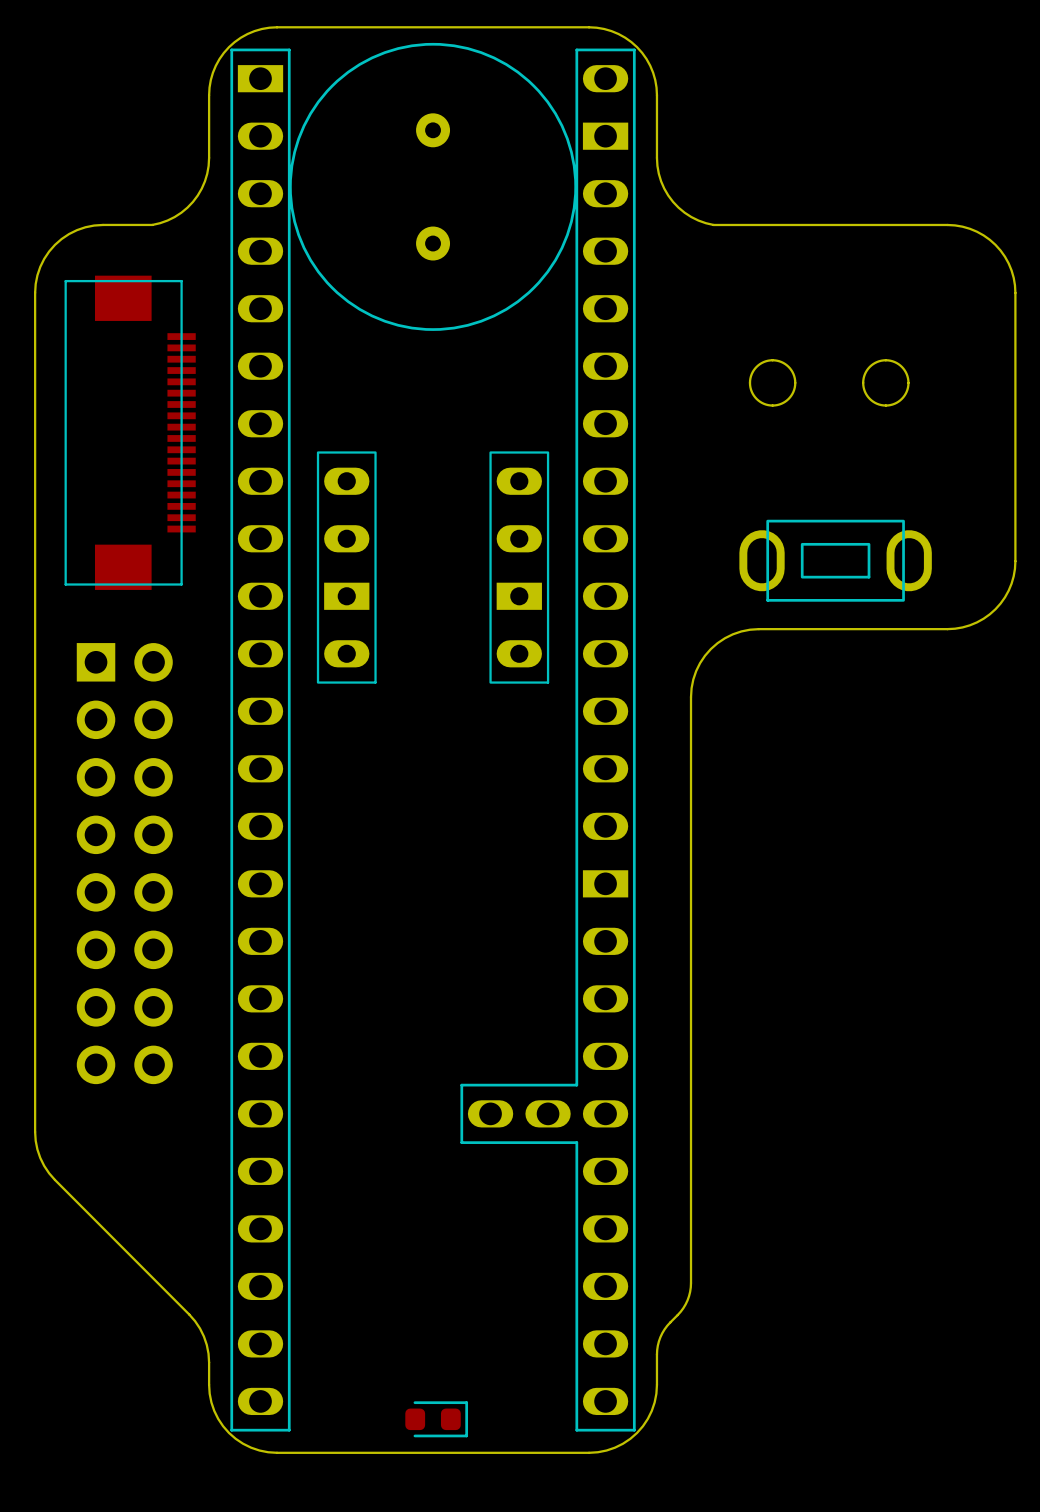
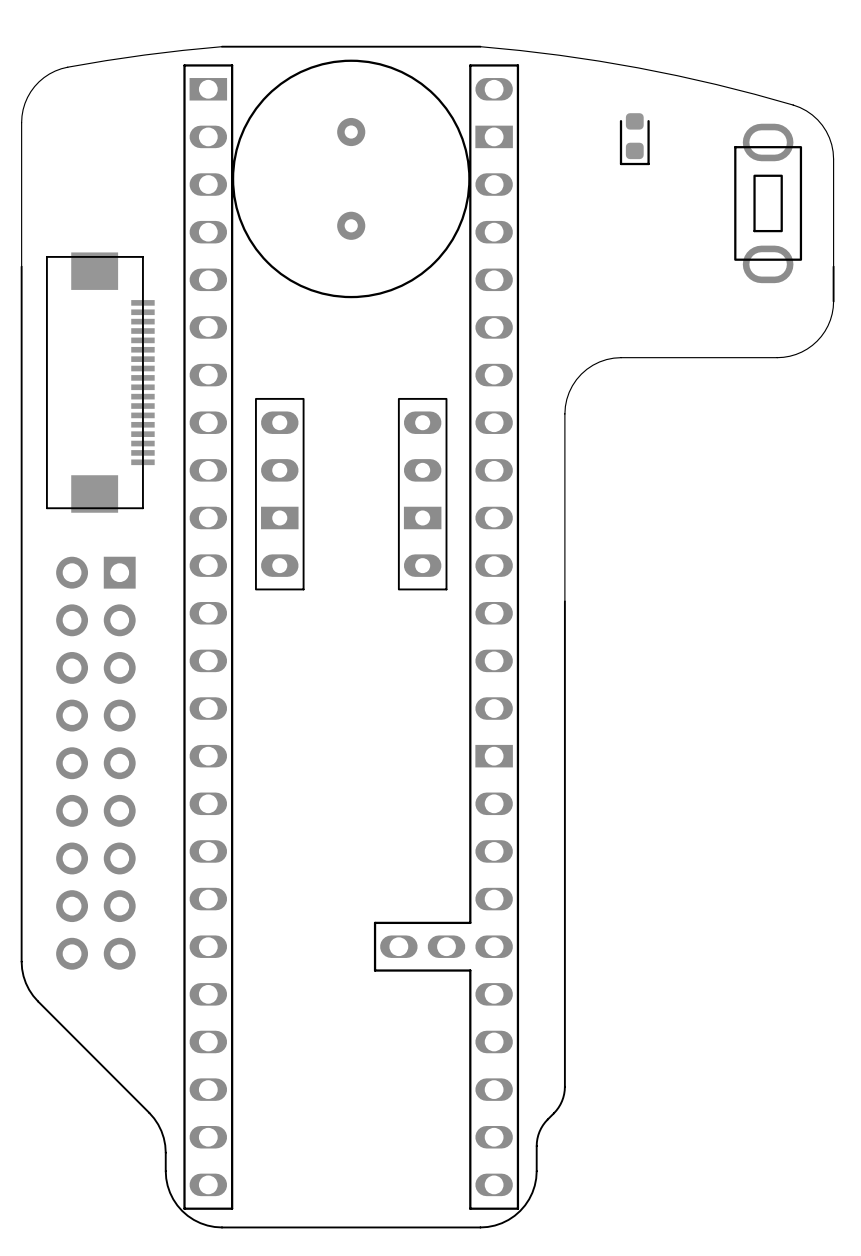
board edge: (277, 27) (261, 28) (240, 37) (223, 52) (215, 65) (209, 87) (208, 165) (201, 188) (193, 201) (174, 217) (160, 223) (94, 225) (69, 234) (55, 244) (44, 258) (37, 275) (35, 292) -> (221, 46) (144, 55) (67, 67) (49, 73) (34, 86) (24, 103) (22, 116) (21, 266)
board edge: (589, 27) (611, 31) (625, 37) (637, 47) (650, 65) (656, 87) (658, 173) (664, 188) (673, 201) (691, 217) (713, 224) (947, 224) (962, 226) (983, 235) (1000, 250) (1011, 270) (1015, 292) -> (480, 46) (559, 55) (638, 67) (754, 94) (806, 110) (817, 119) (826, 131) (833, 151) (833, 266)
part: none -> (634, 139)
board edge: (1015, 334) (1014, 568) (1008, 590) (995, 609) (976, 622) (955, 628) (758, 629) (741, 631) (724, 638) (705, 655) (693, 679) (691, 697) -> (833, 301) (830, 319) (821, 336) (807, 349) (795, 354) (777, 357) (613, 358) (599, 361) (581, 374) (572, 385) (565, 406) (564, 601)
board edge: (772, 360) (763, 362) (756, 366) (751, 374) (749, 382) (751, 391) (756, 398) (763, 403) (772, 405) (781, 403) (788, 398) (793, 391) (795, 382) (793, 374) (788, 366) (781, 362) (772, 360) -> none
board edge: (885, 360) (877, 362) (869, 366) (864, 374) (863, 382) (864, 391) (869, 398) (877, 403) (885, 405) (894, 403) (901, 398) (906, 391) (908, 382) (906, 374) (901, 366) (894, 362) (885, 360) -> none
part rotation: 0° (835, 560) -> 90° clockwise (768, 203)
part position: (835, 560) -> (768, 203)
part: (124, 863) -> none
part: none -> (95, 763)
part: (436, 1419) -> none

